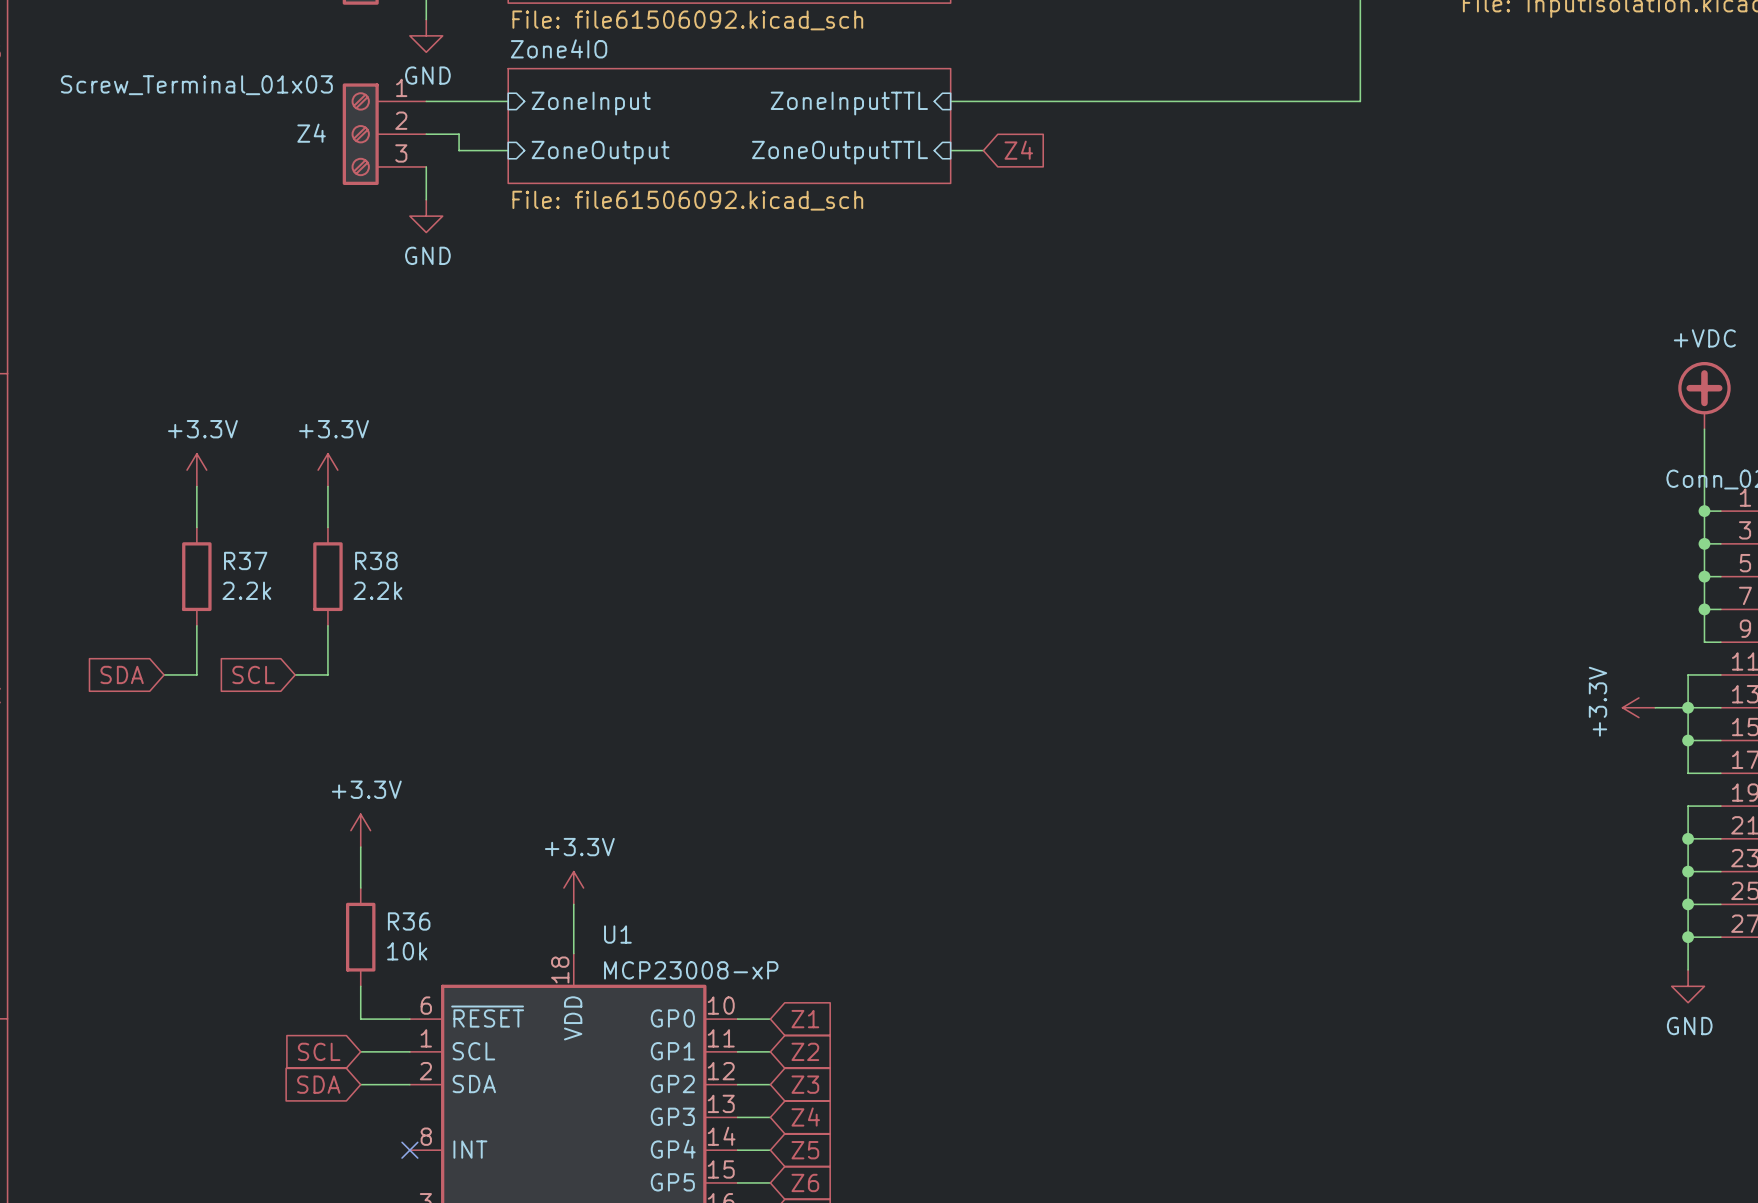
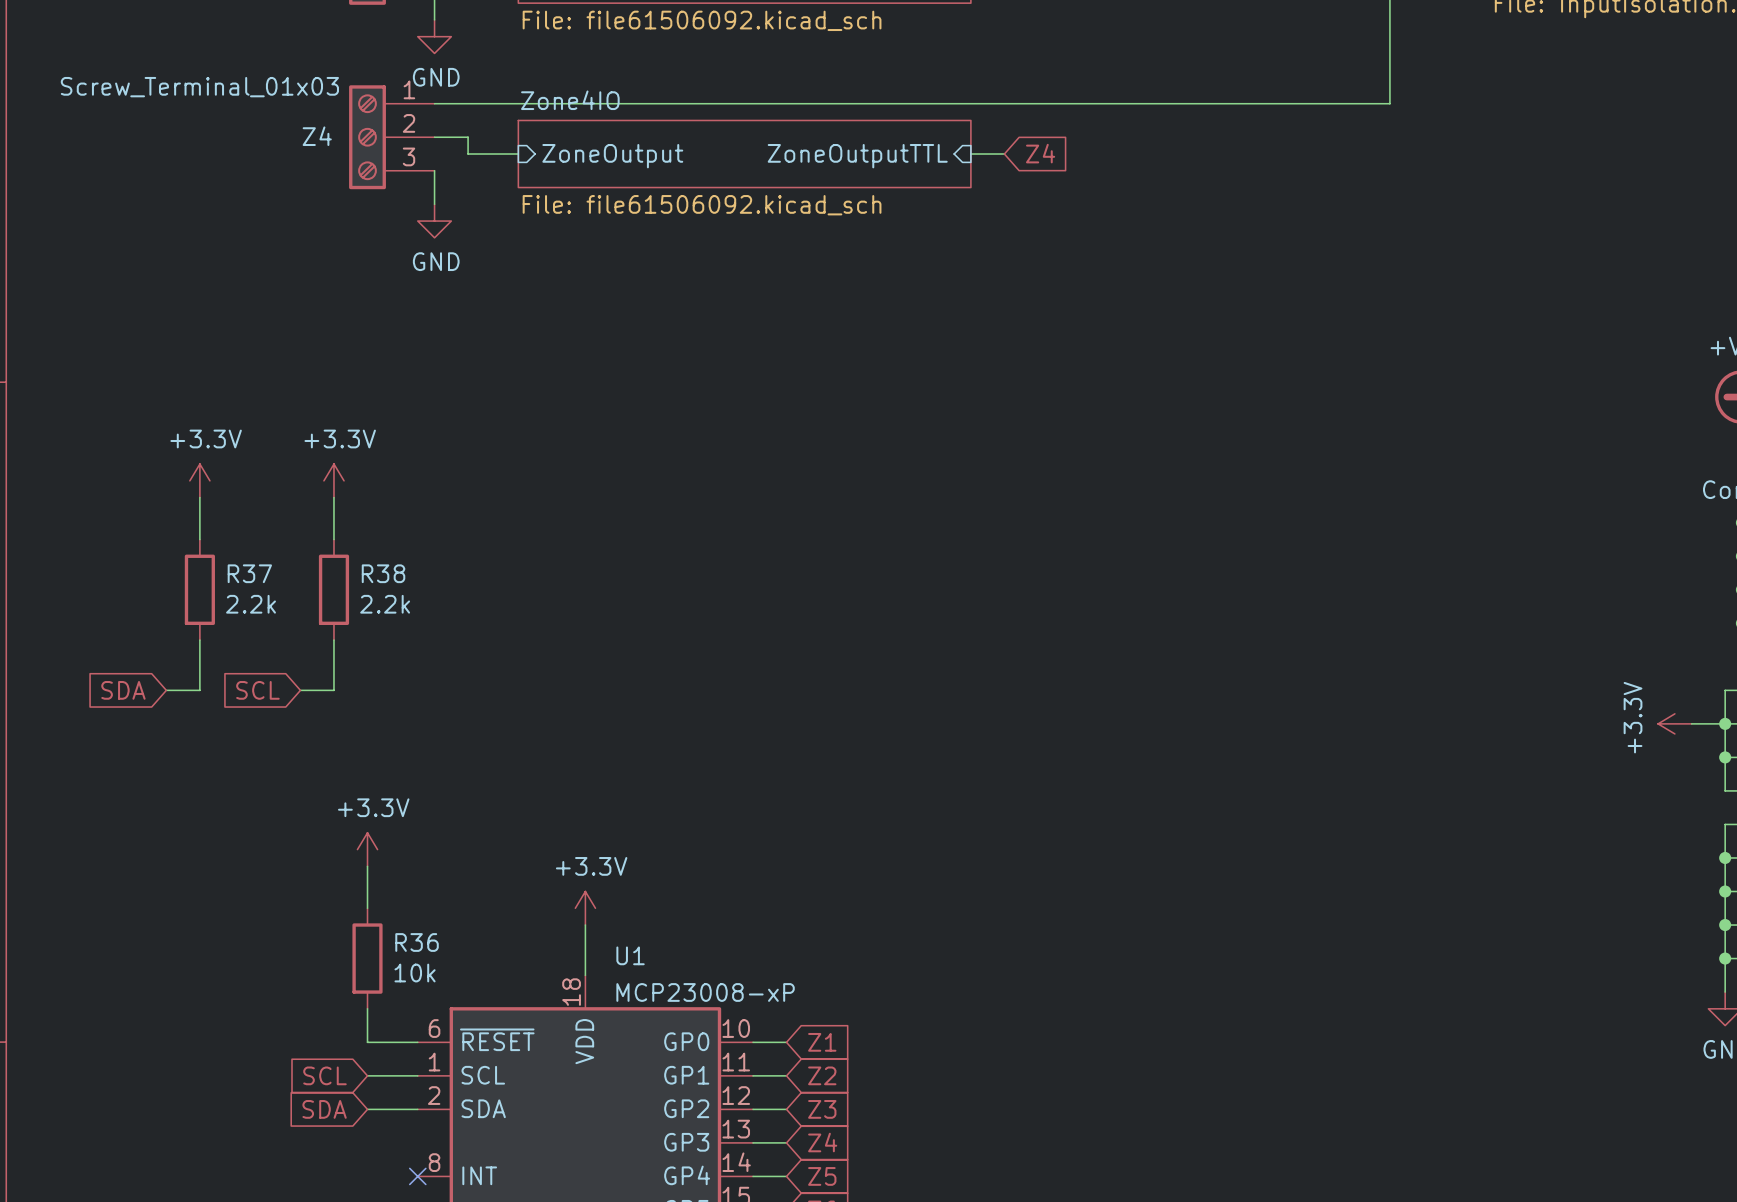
sheet Zone4IO shape: [508, 68, 951, 184] -> [518, 120, 971, 188]
wire: none -> (518, 103) (970, 103)
sheet pin: ZoneInput (591, 103) -> none
sheet pin: ZoneInputTTL (849, 103) -> none

